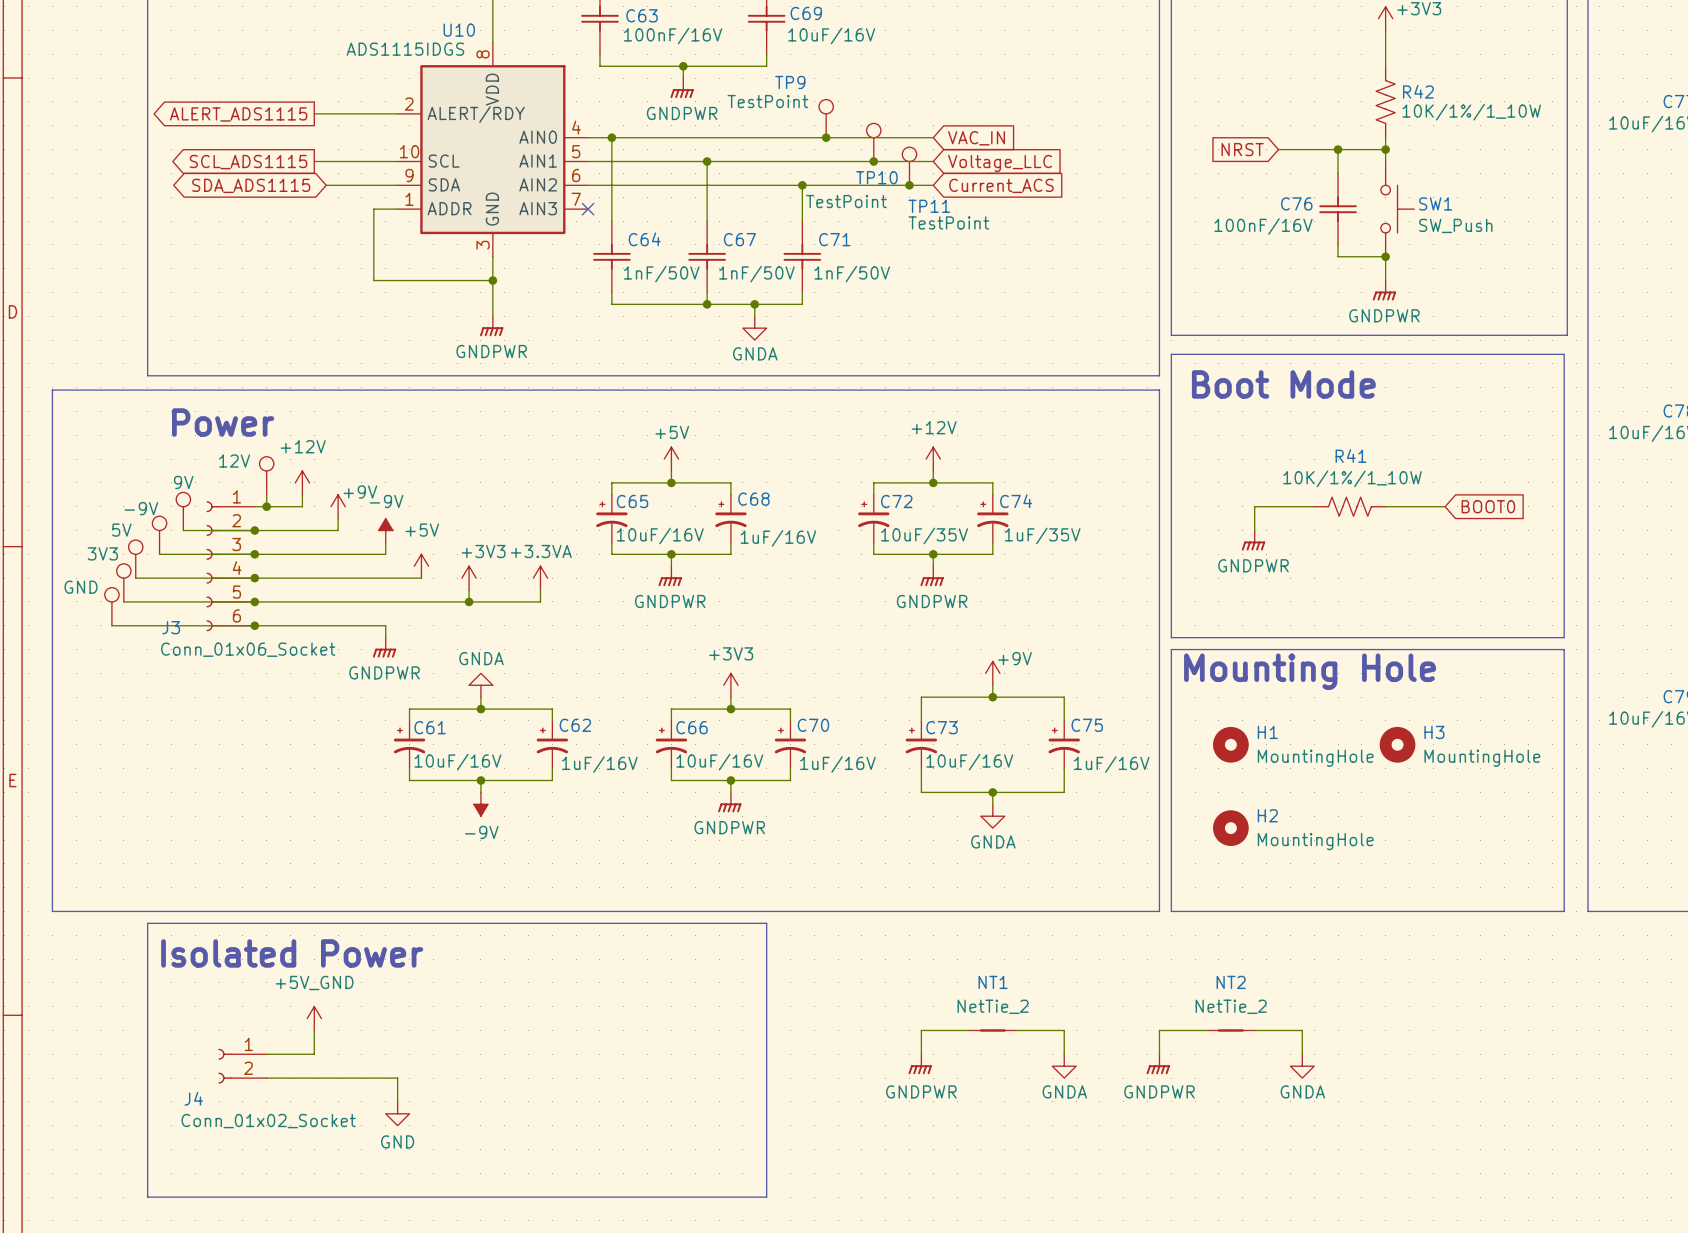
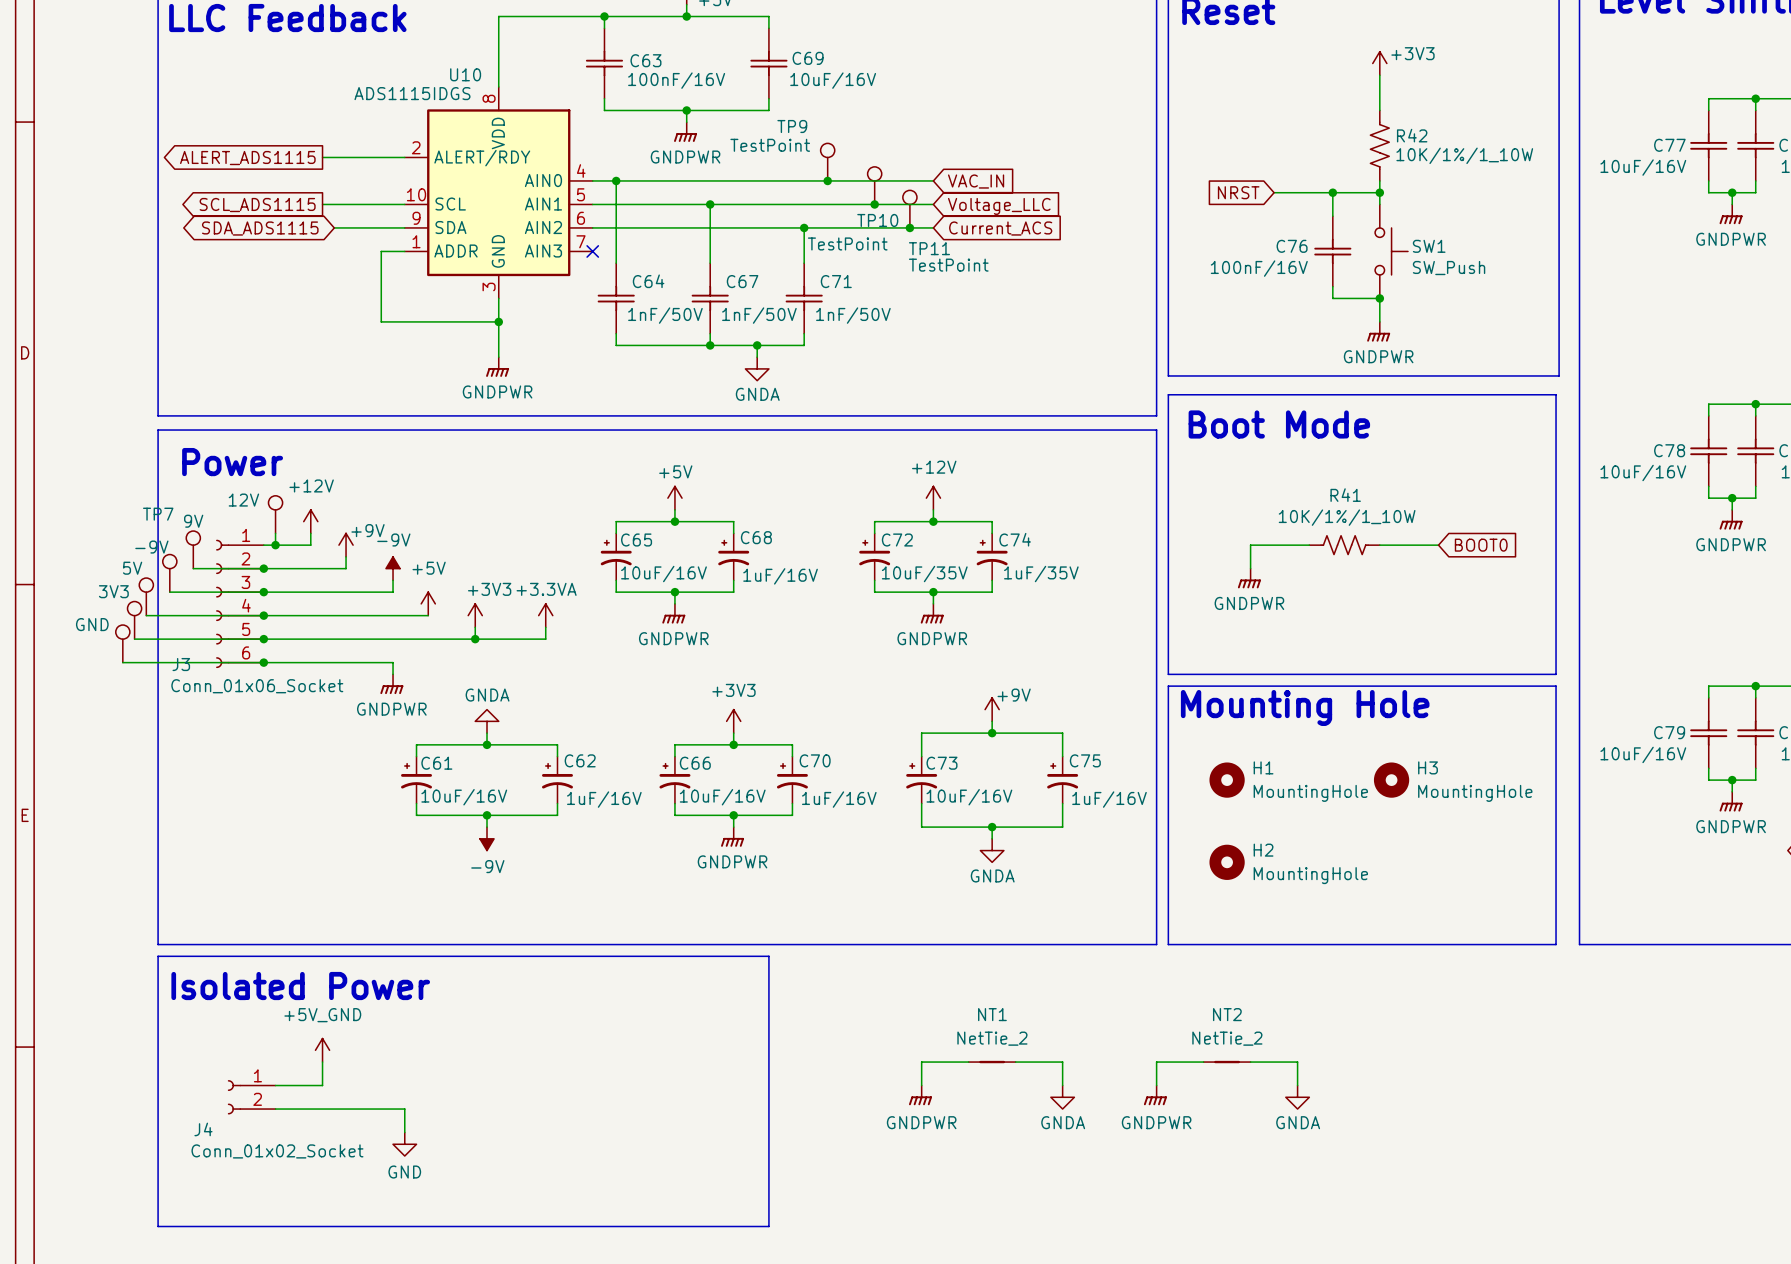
line: (147, 390) (52, 390) (52, 911) (147, 911) -> (158, 430) (158, 944)
TP7 name: none -> TP7 (158, 514)

